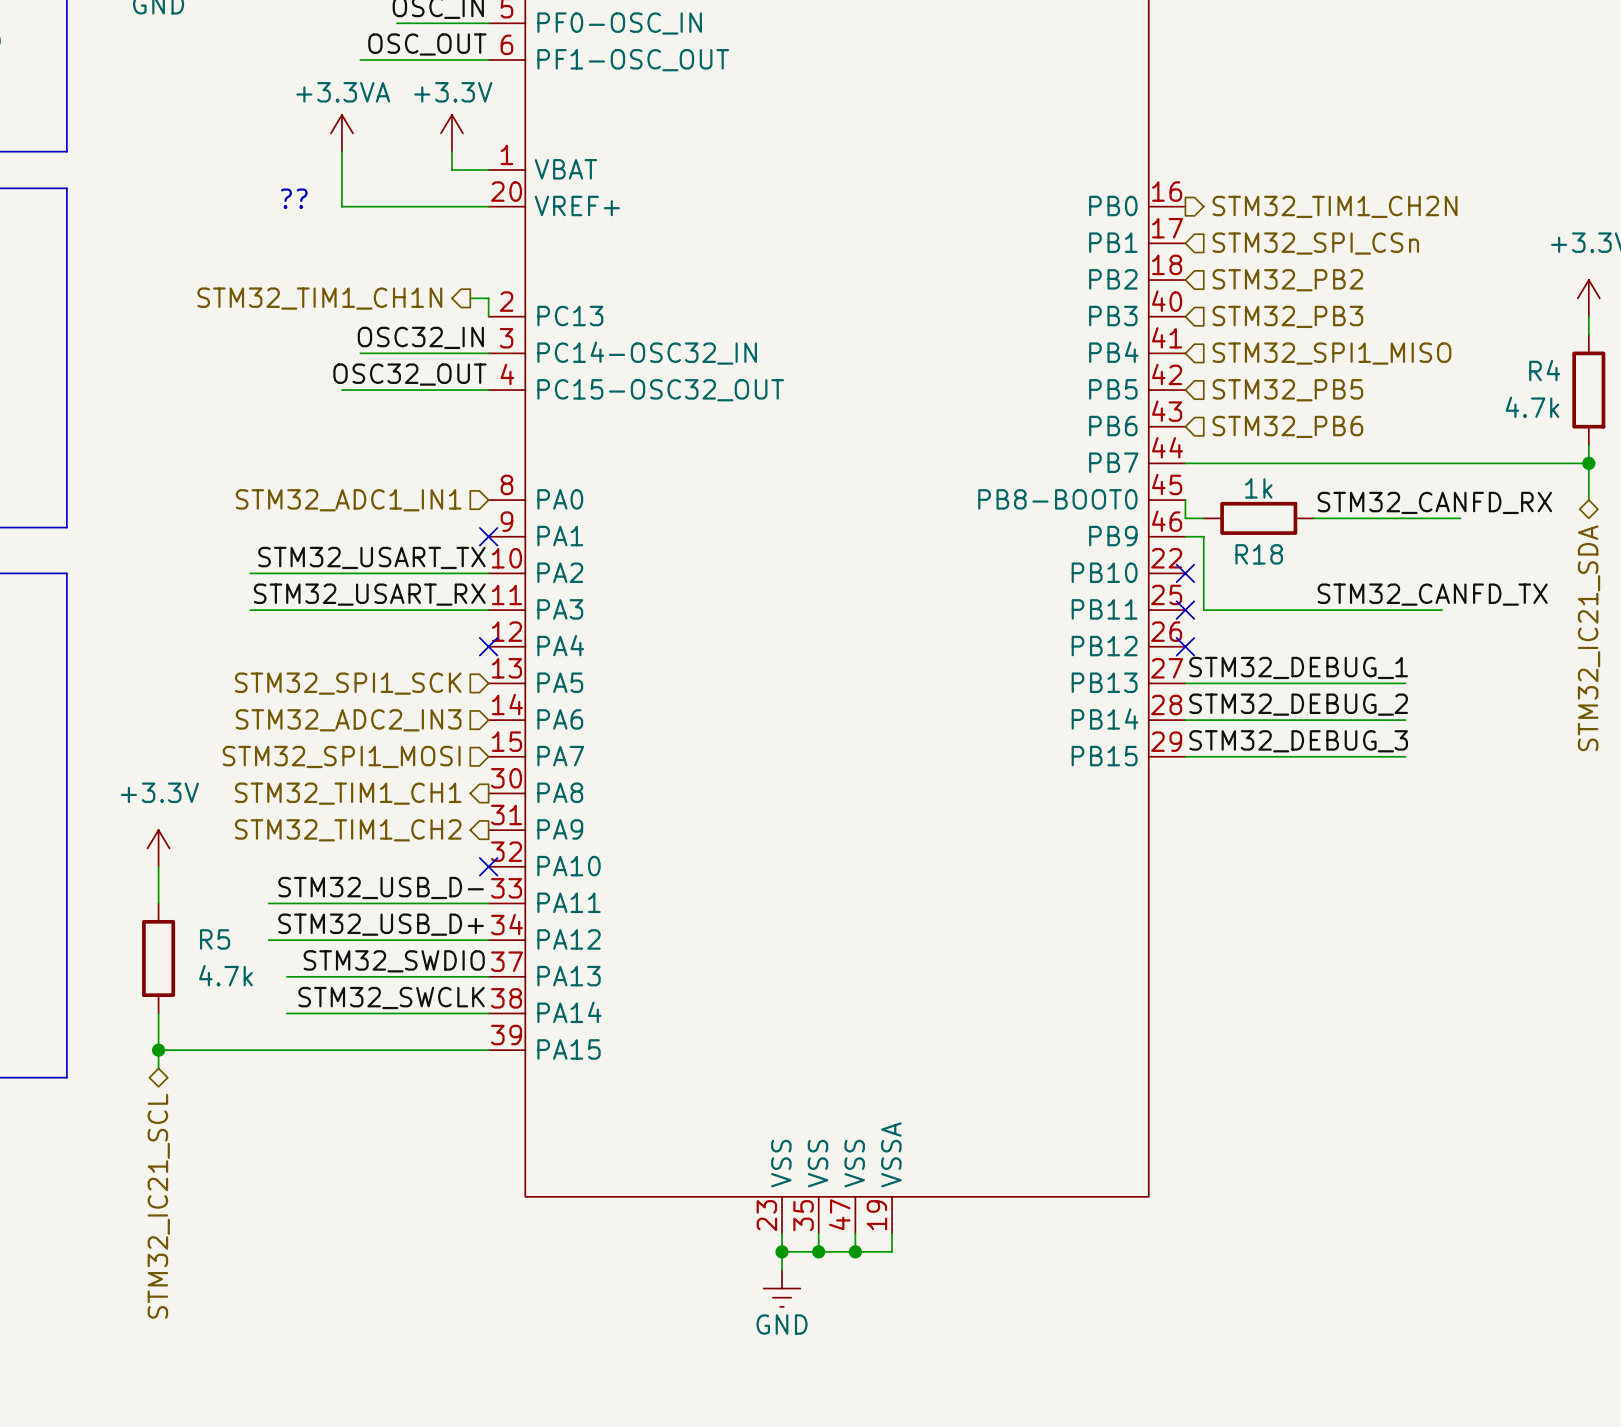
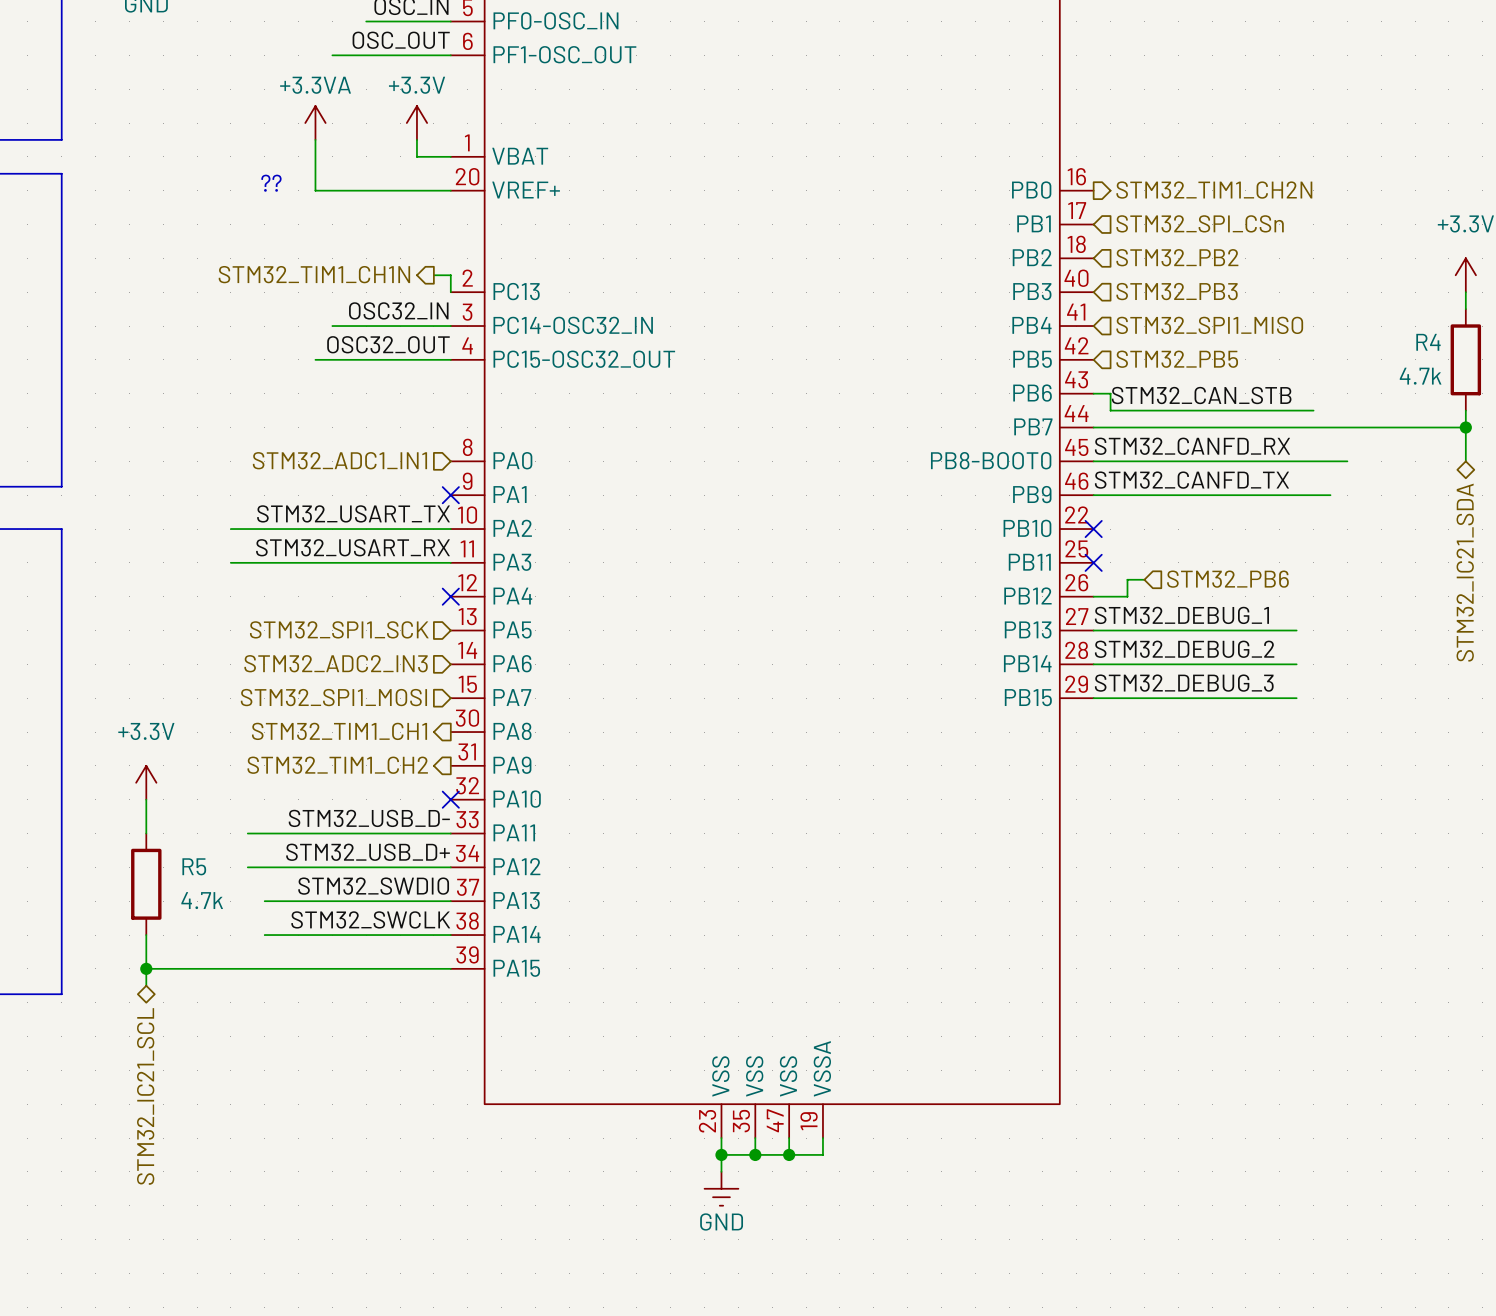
wire: none -> (1093, 393) (1110, 393) (1110, 410) (1313, 410)
hierarchical label position: STM32_PB6 (1287, 426) -> STM32_PB6 (1227, 579)
label: none -> STM32_CAN_STB (1201, 395)
wire: (1185, 500) (1185, 518) (1203, 518) -> (1093, 461) (1347, 461)
label position: STM32_CANFD_RX (1434, 502) -> STM32_CANFD_RX (1192, 446)
R18: 1k (1258, 518) -> none
wire: (1313, 518) (1460, 518) -> none
wire: (1203, 536) (1203, 610) (1442, 610) -> (1110, 495) (1330, 495)
label position: STM32_CANFD_TX (1432, 594) -> STM32_CANFD_TX (1191, 480)
wire: none -> (1144, 579) (1127, 579) (1127, 596) (1093, 596)
no-connect mark: (1185, 646) -> none

